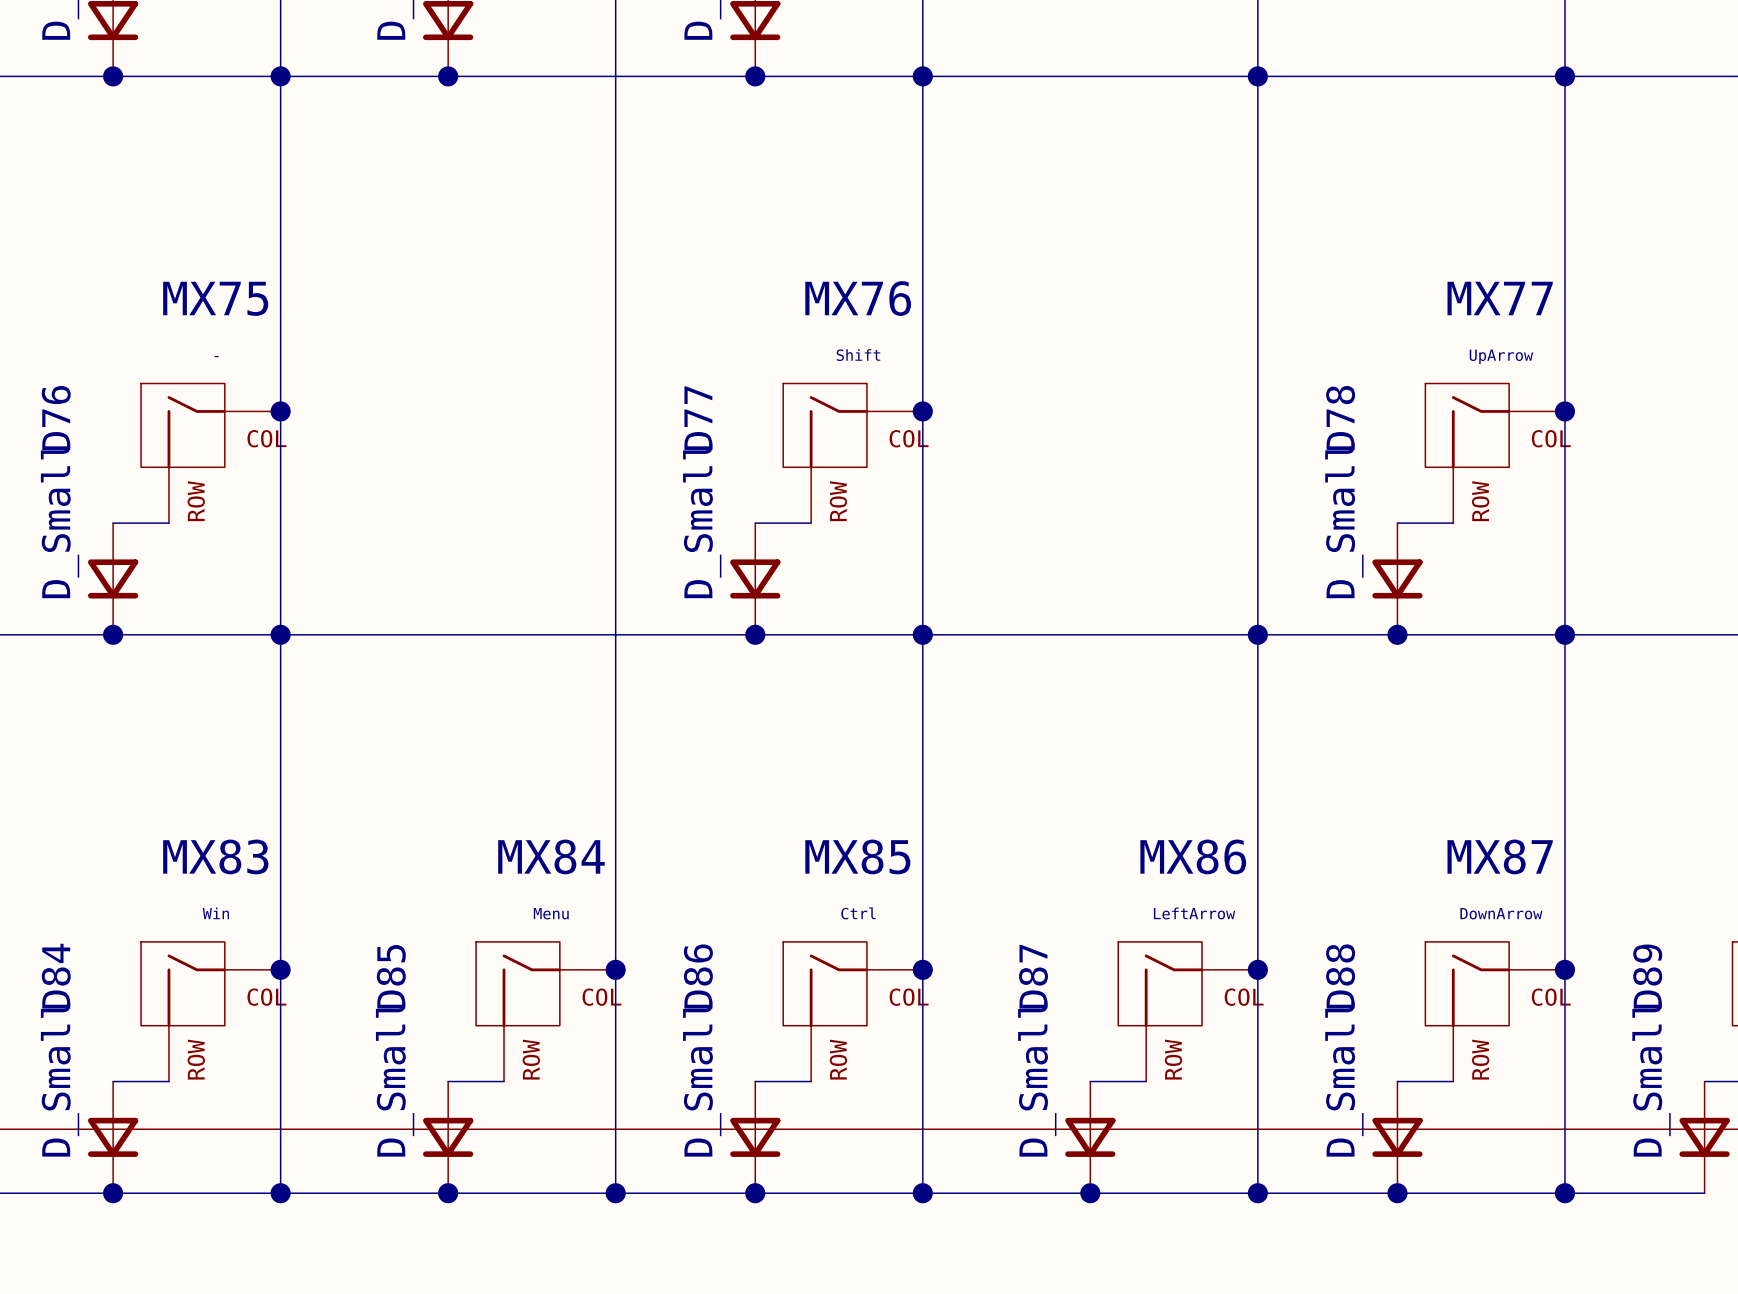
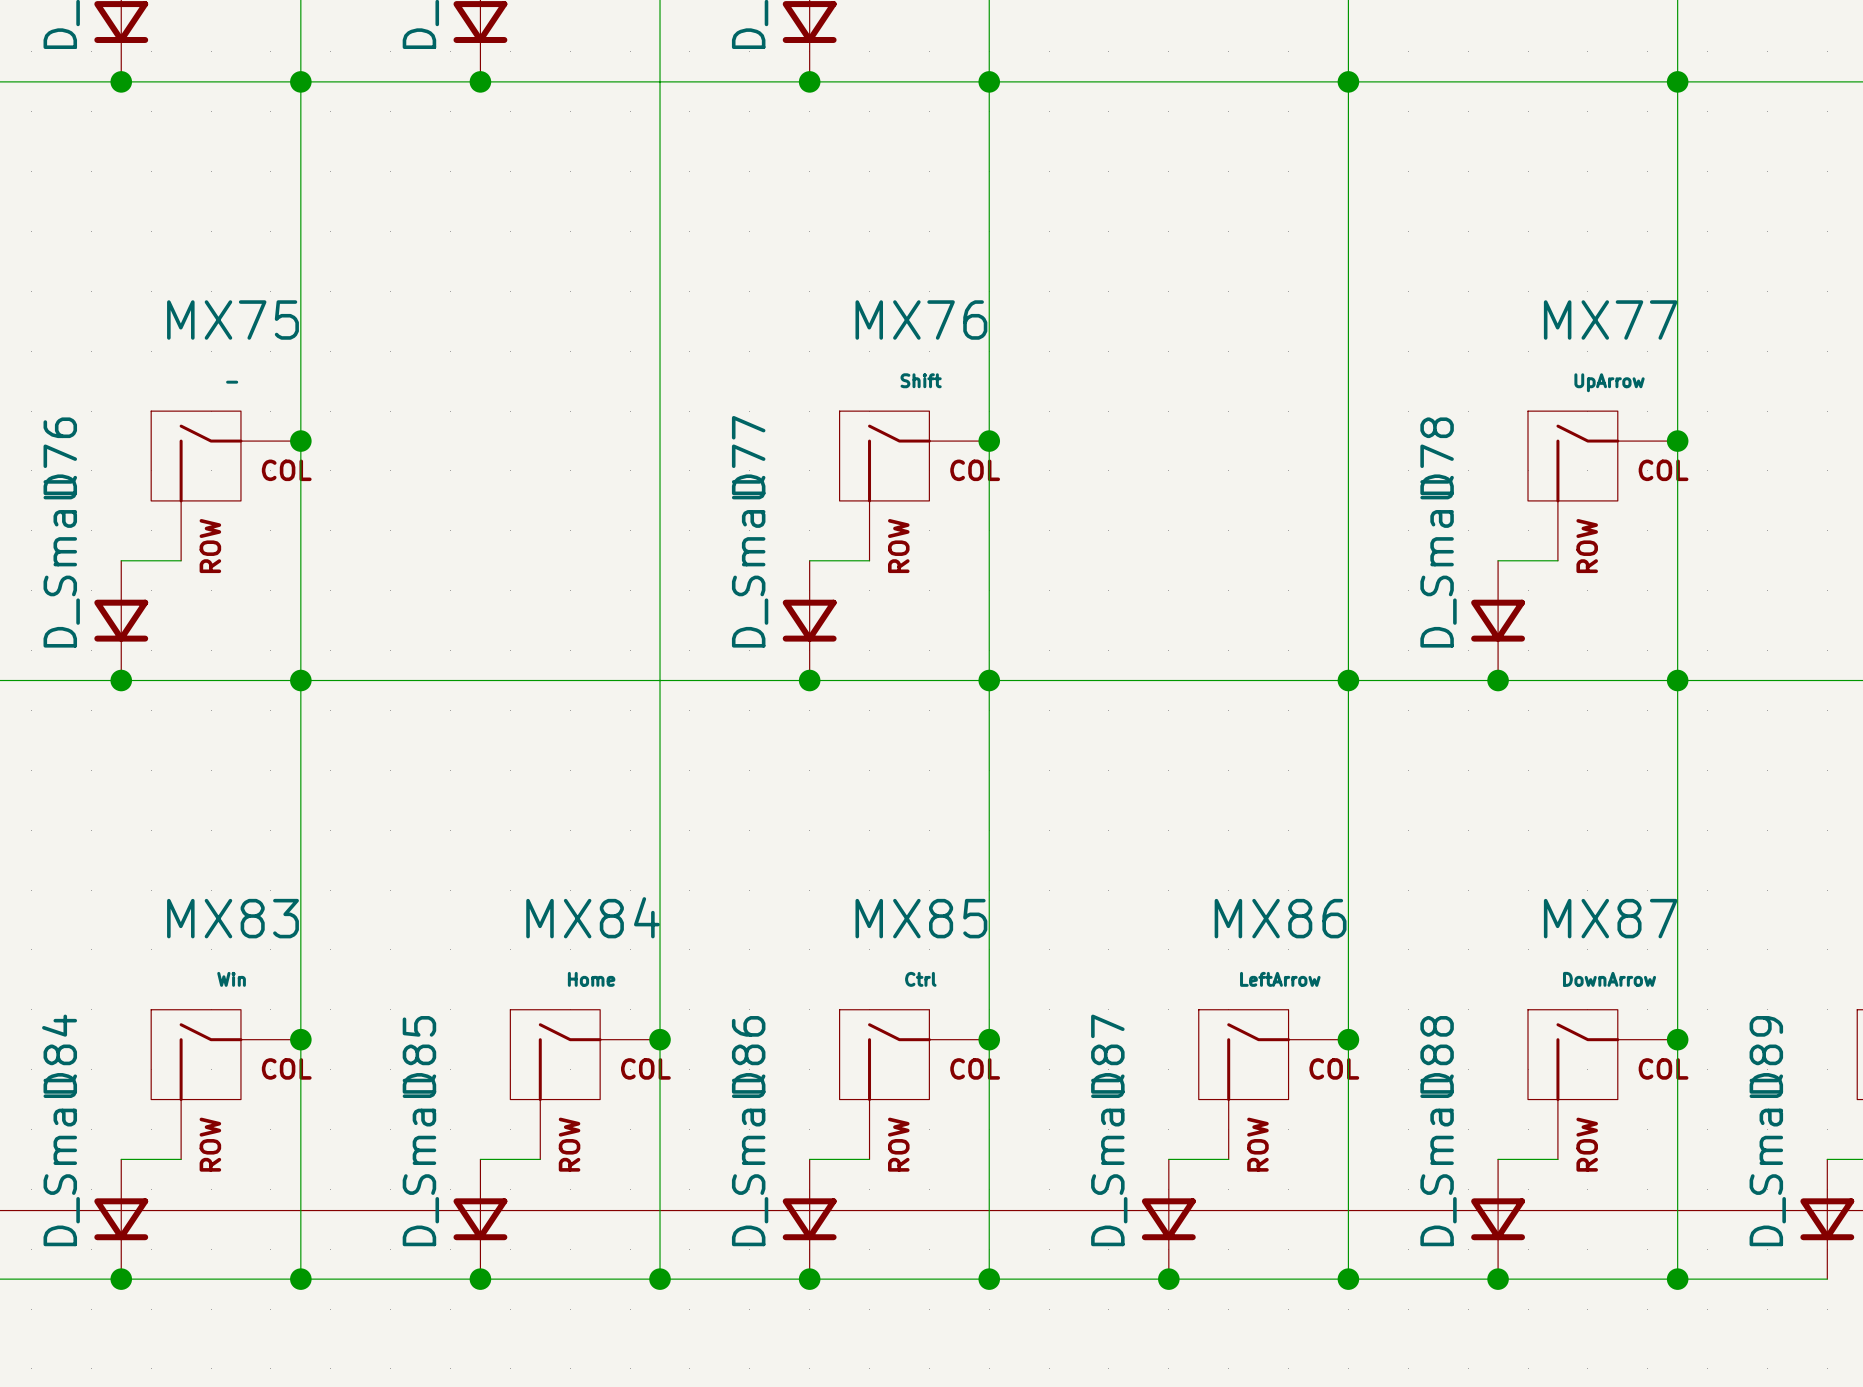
MX84 value: Menu (551, 913) -> Home (591, 979)

